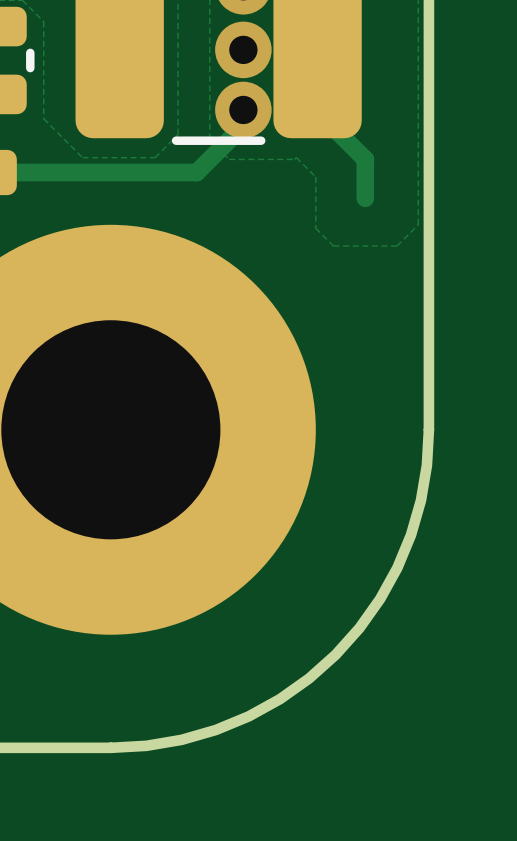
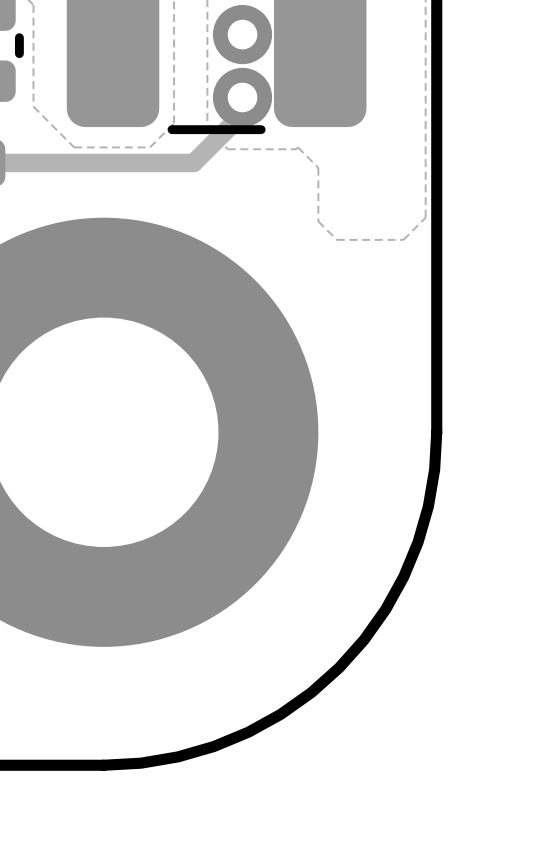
track: (314, 108) (365, 159) (365, 198) -> none

